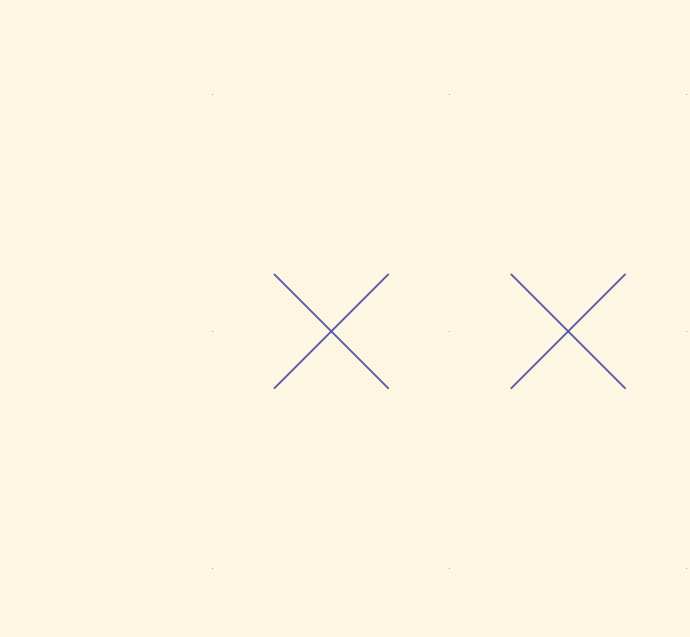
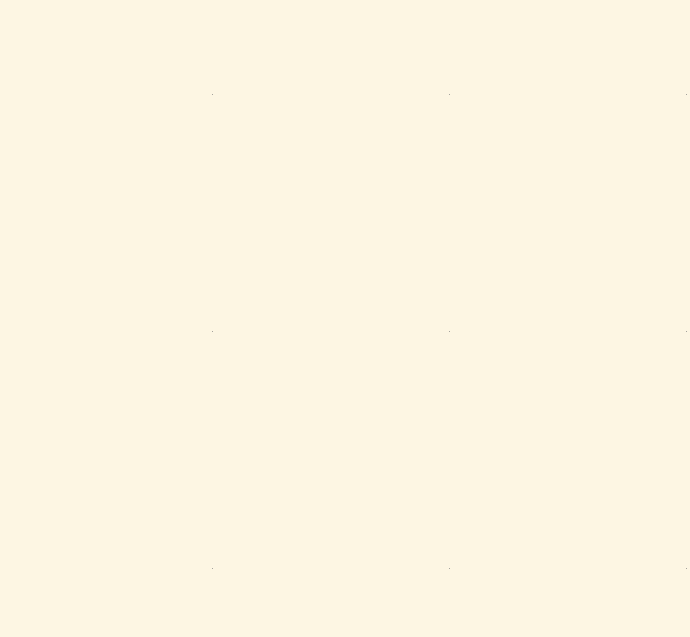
no-connect mark: (331, 331) -> none
no-connect mark: (568, 331) -> none

